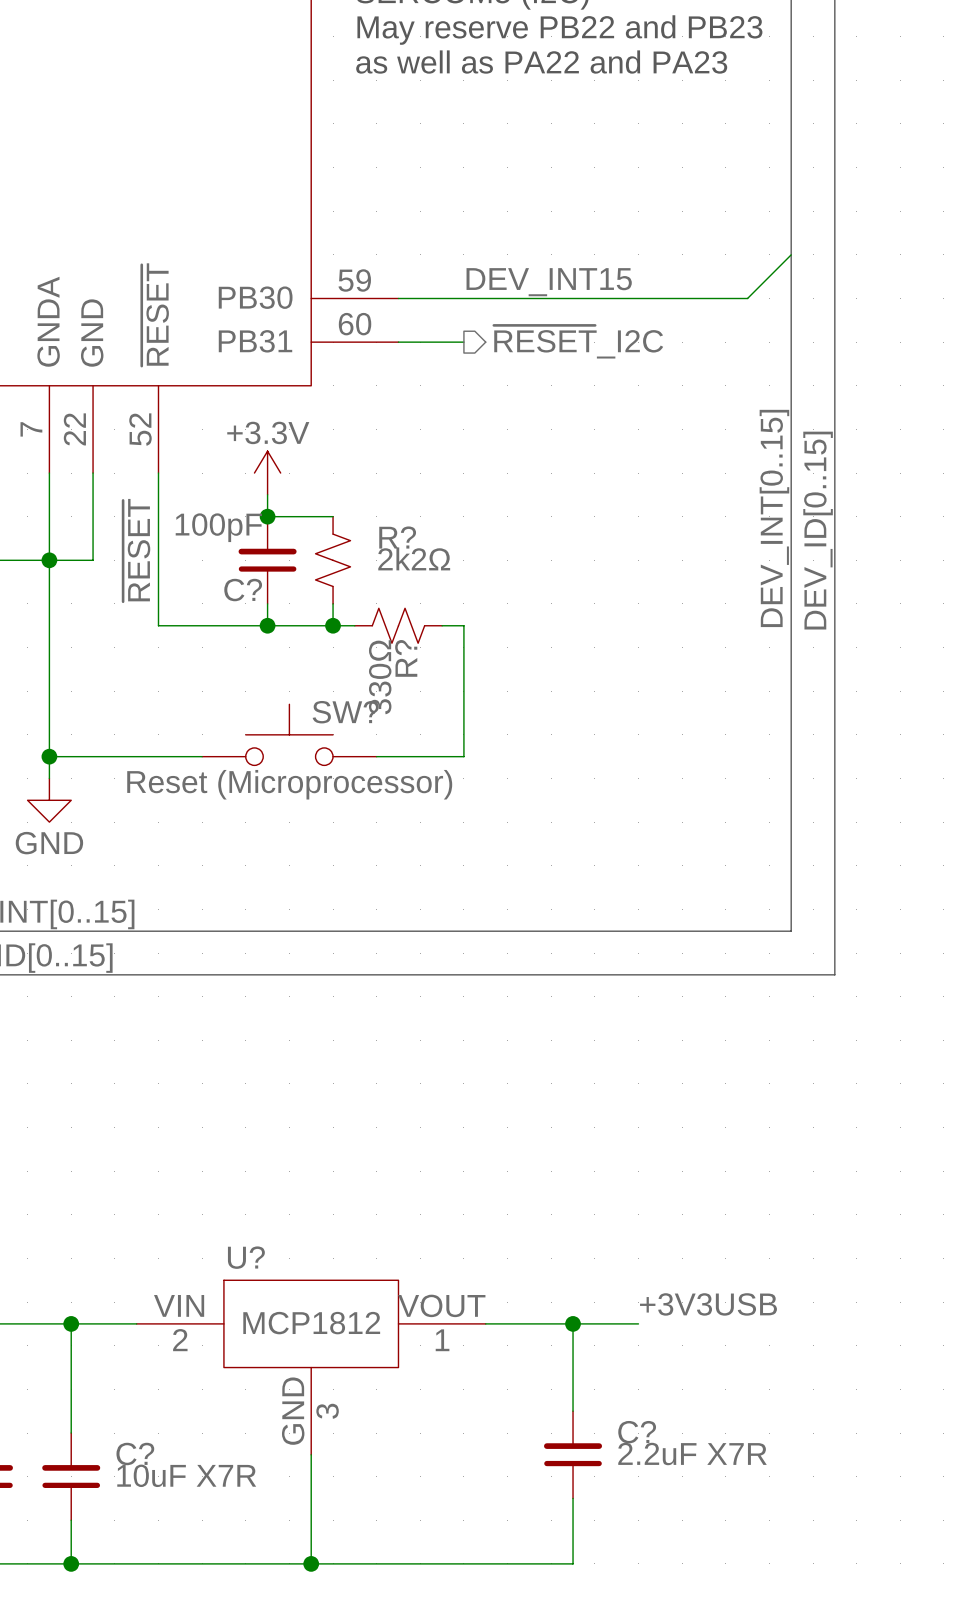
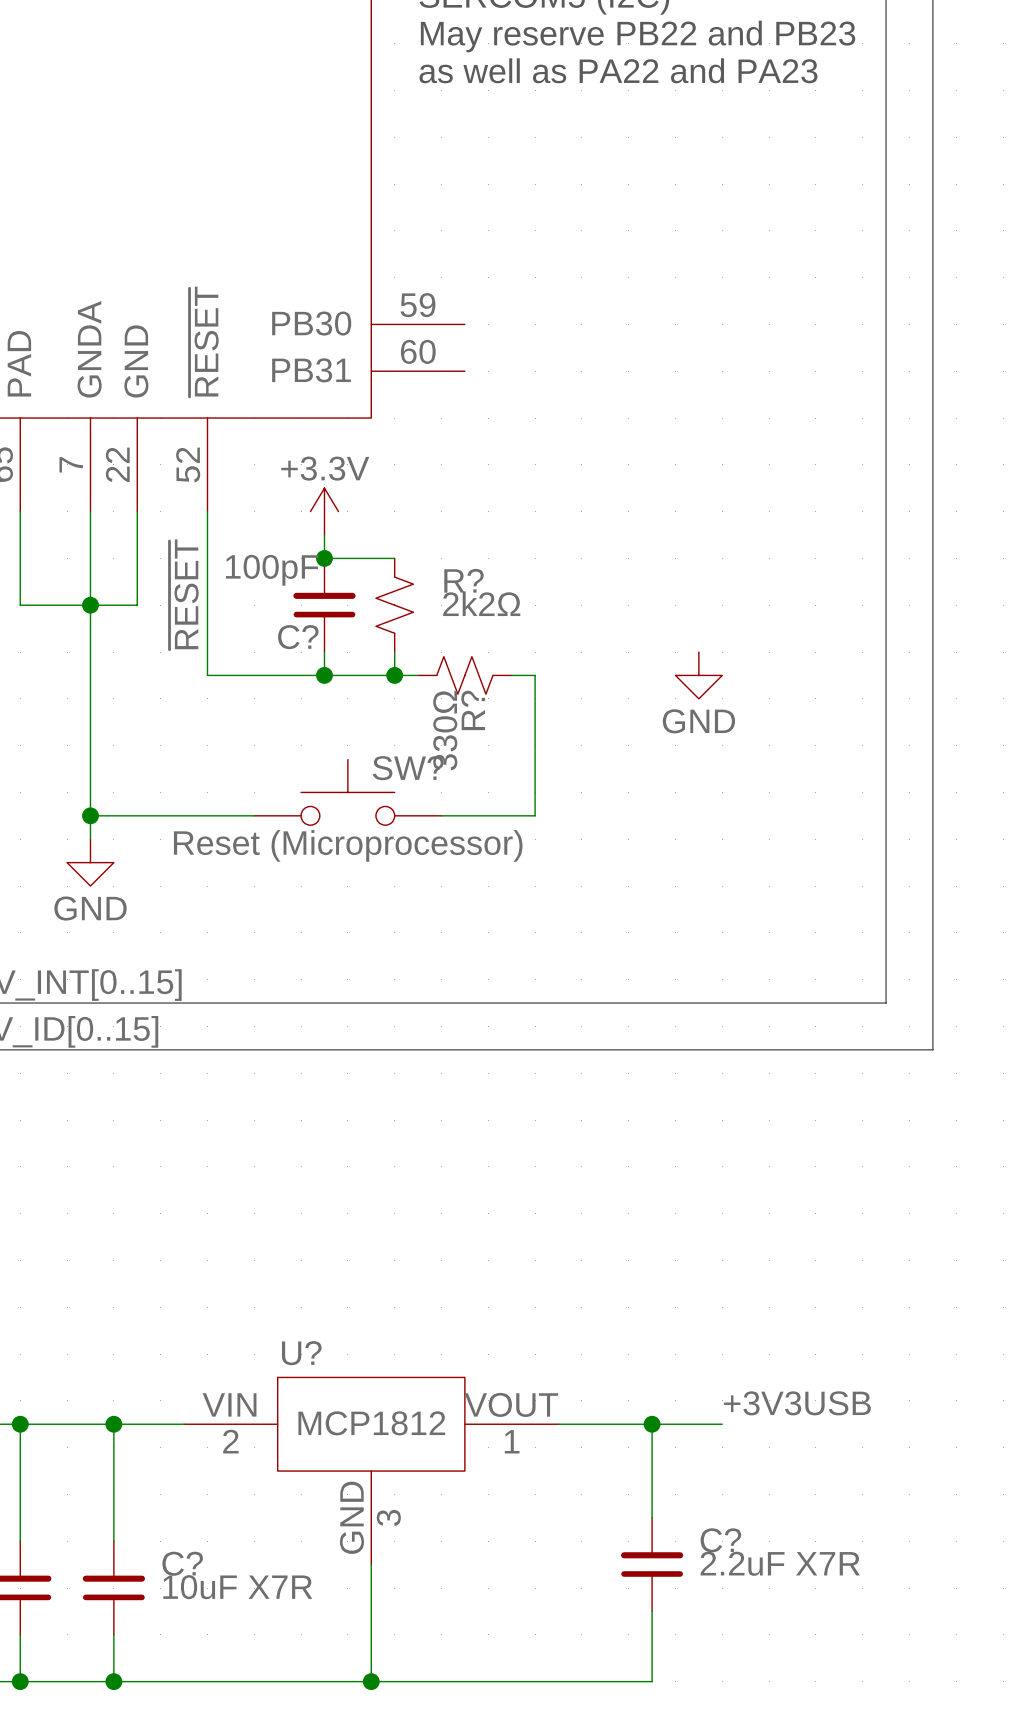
wire: (791, 254) (747, 298) (398, 298) -> none
label: DEV_INT15 (549, 282) -> none
hierarchical label: ~{RESET}_I2C (578, 341) -> none
wire: (398, 342) (463, 342) -> none
label: DEV_INT[0..15] (774, 518) -> none
label: DEV_ID[0..15] (818, 530) -> none
power symbol: none -> GND (698, 675)

